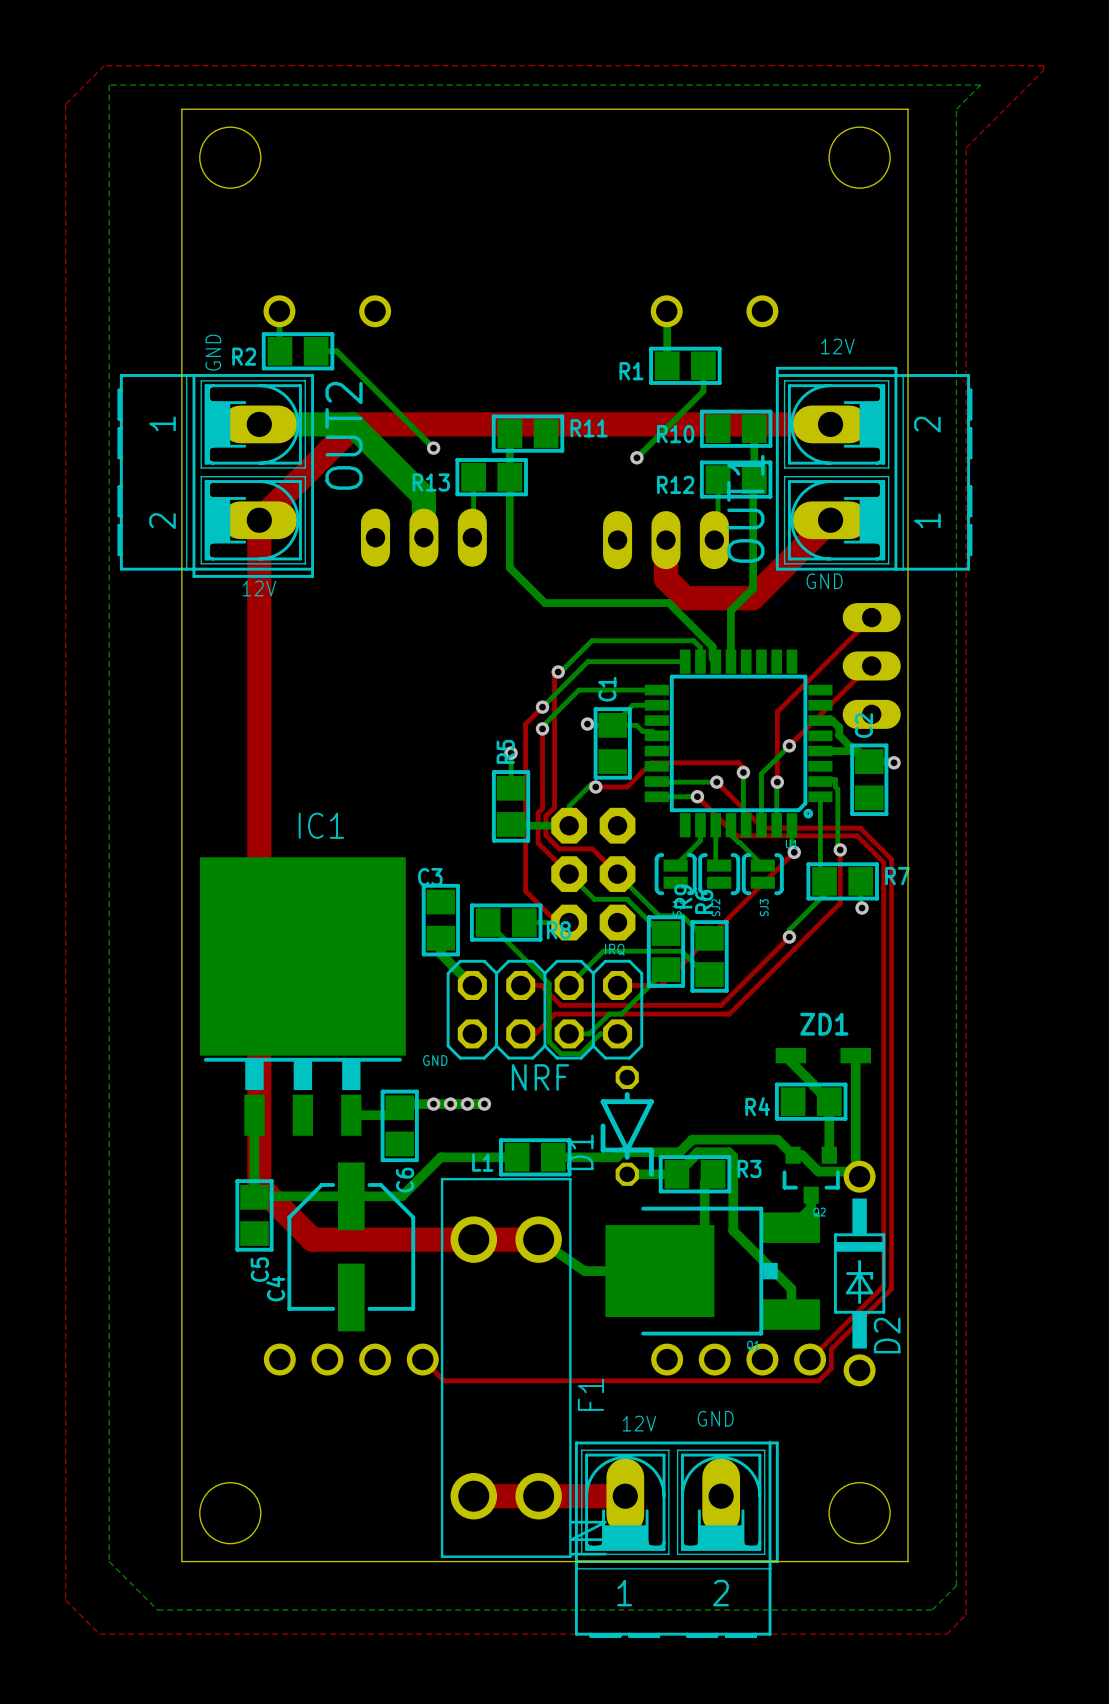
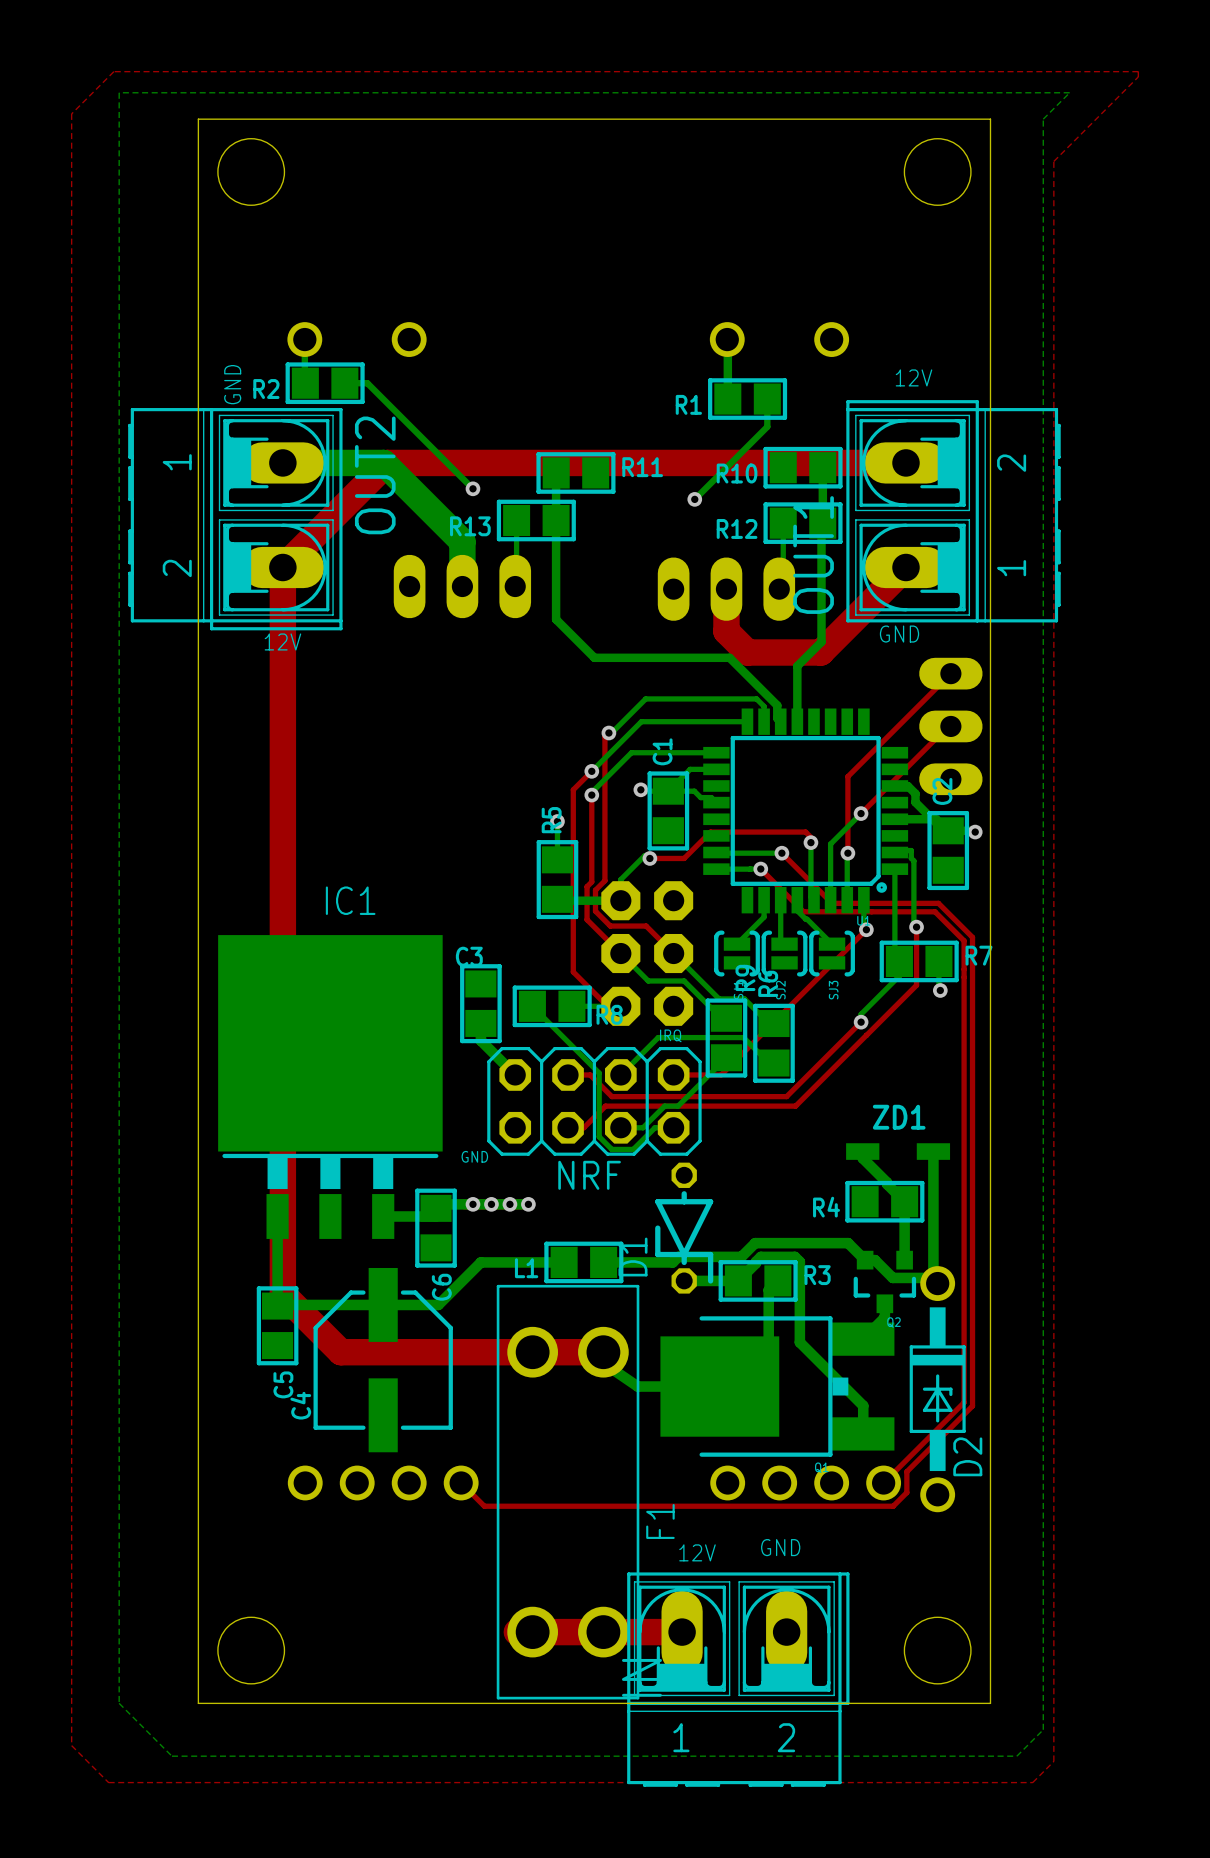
F1 position: (506, 1367) -> (568, 1492)

